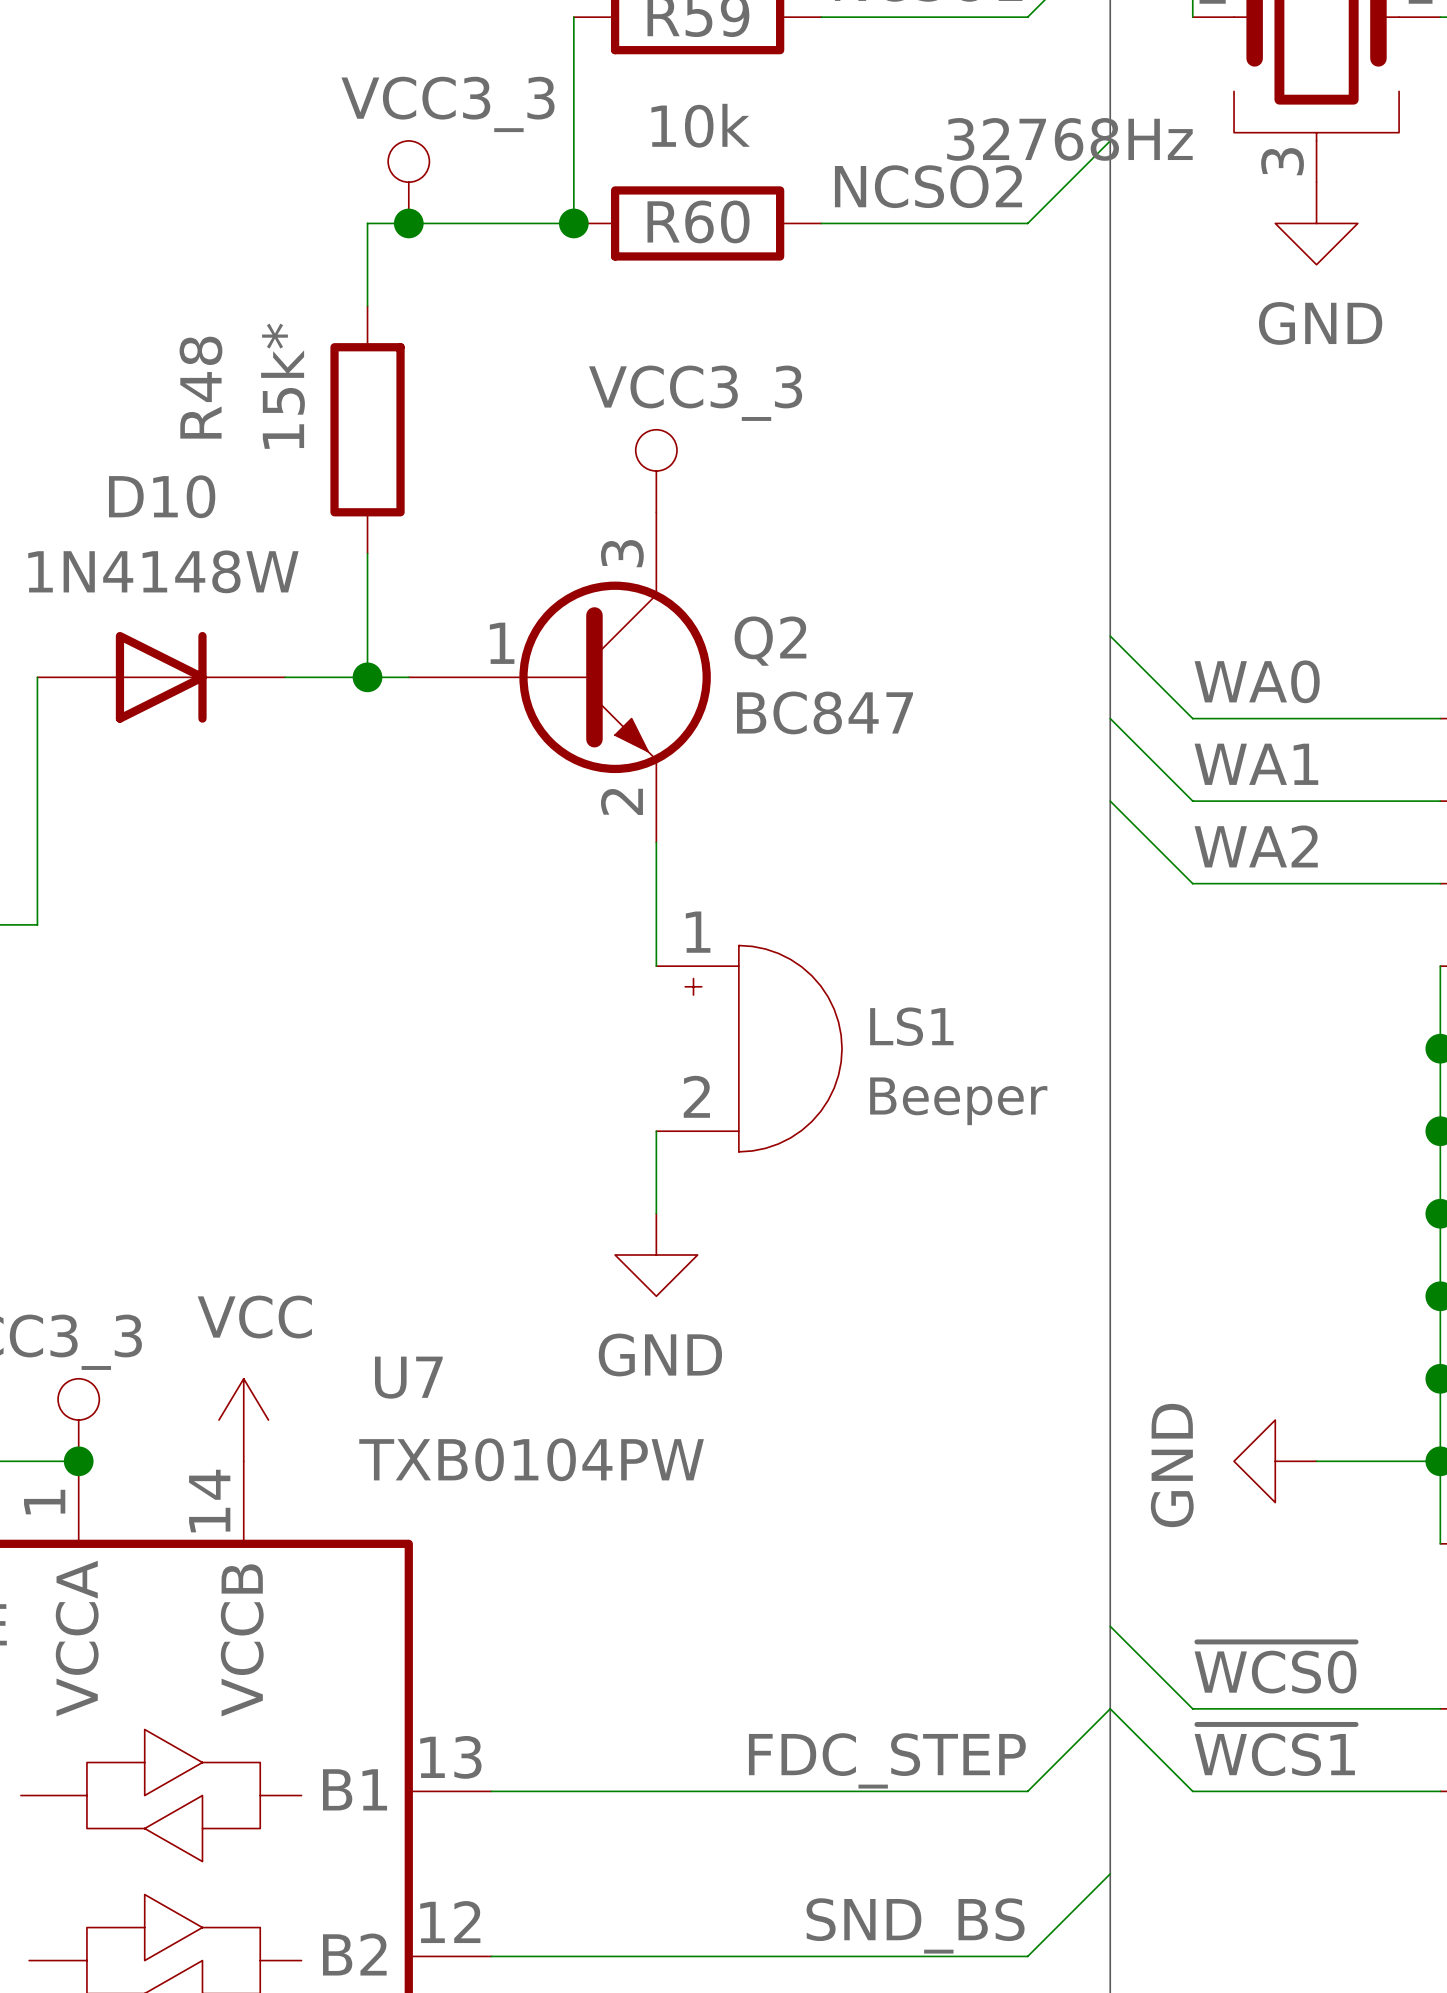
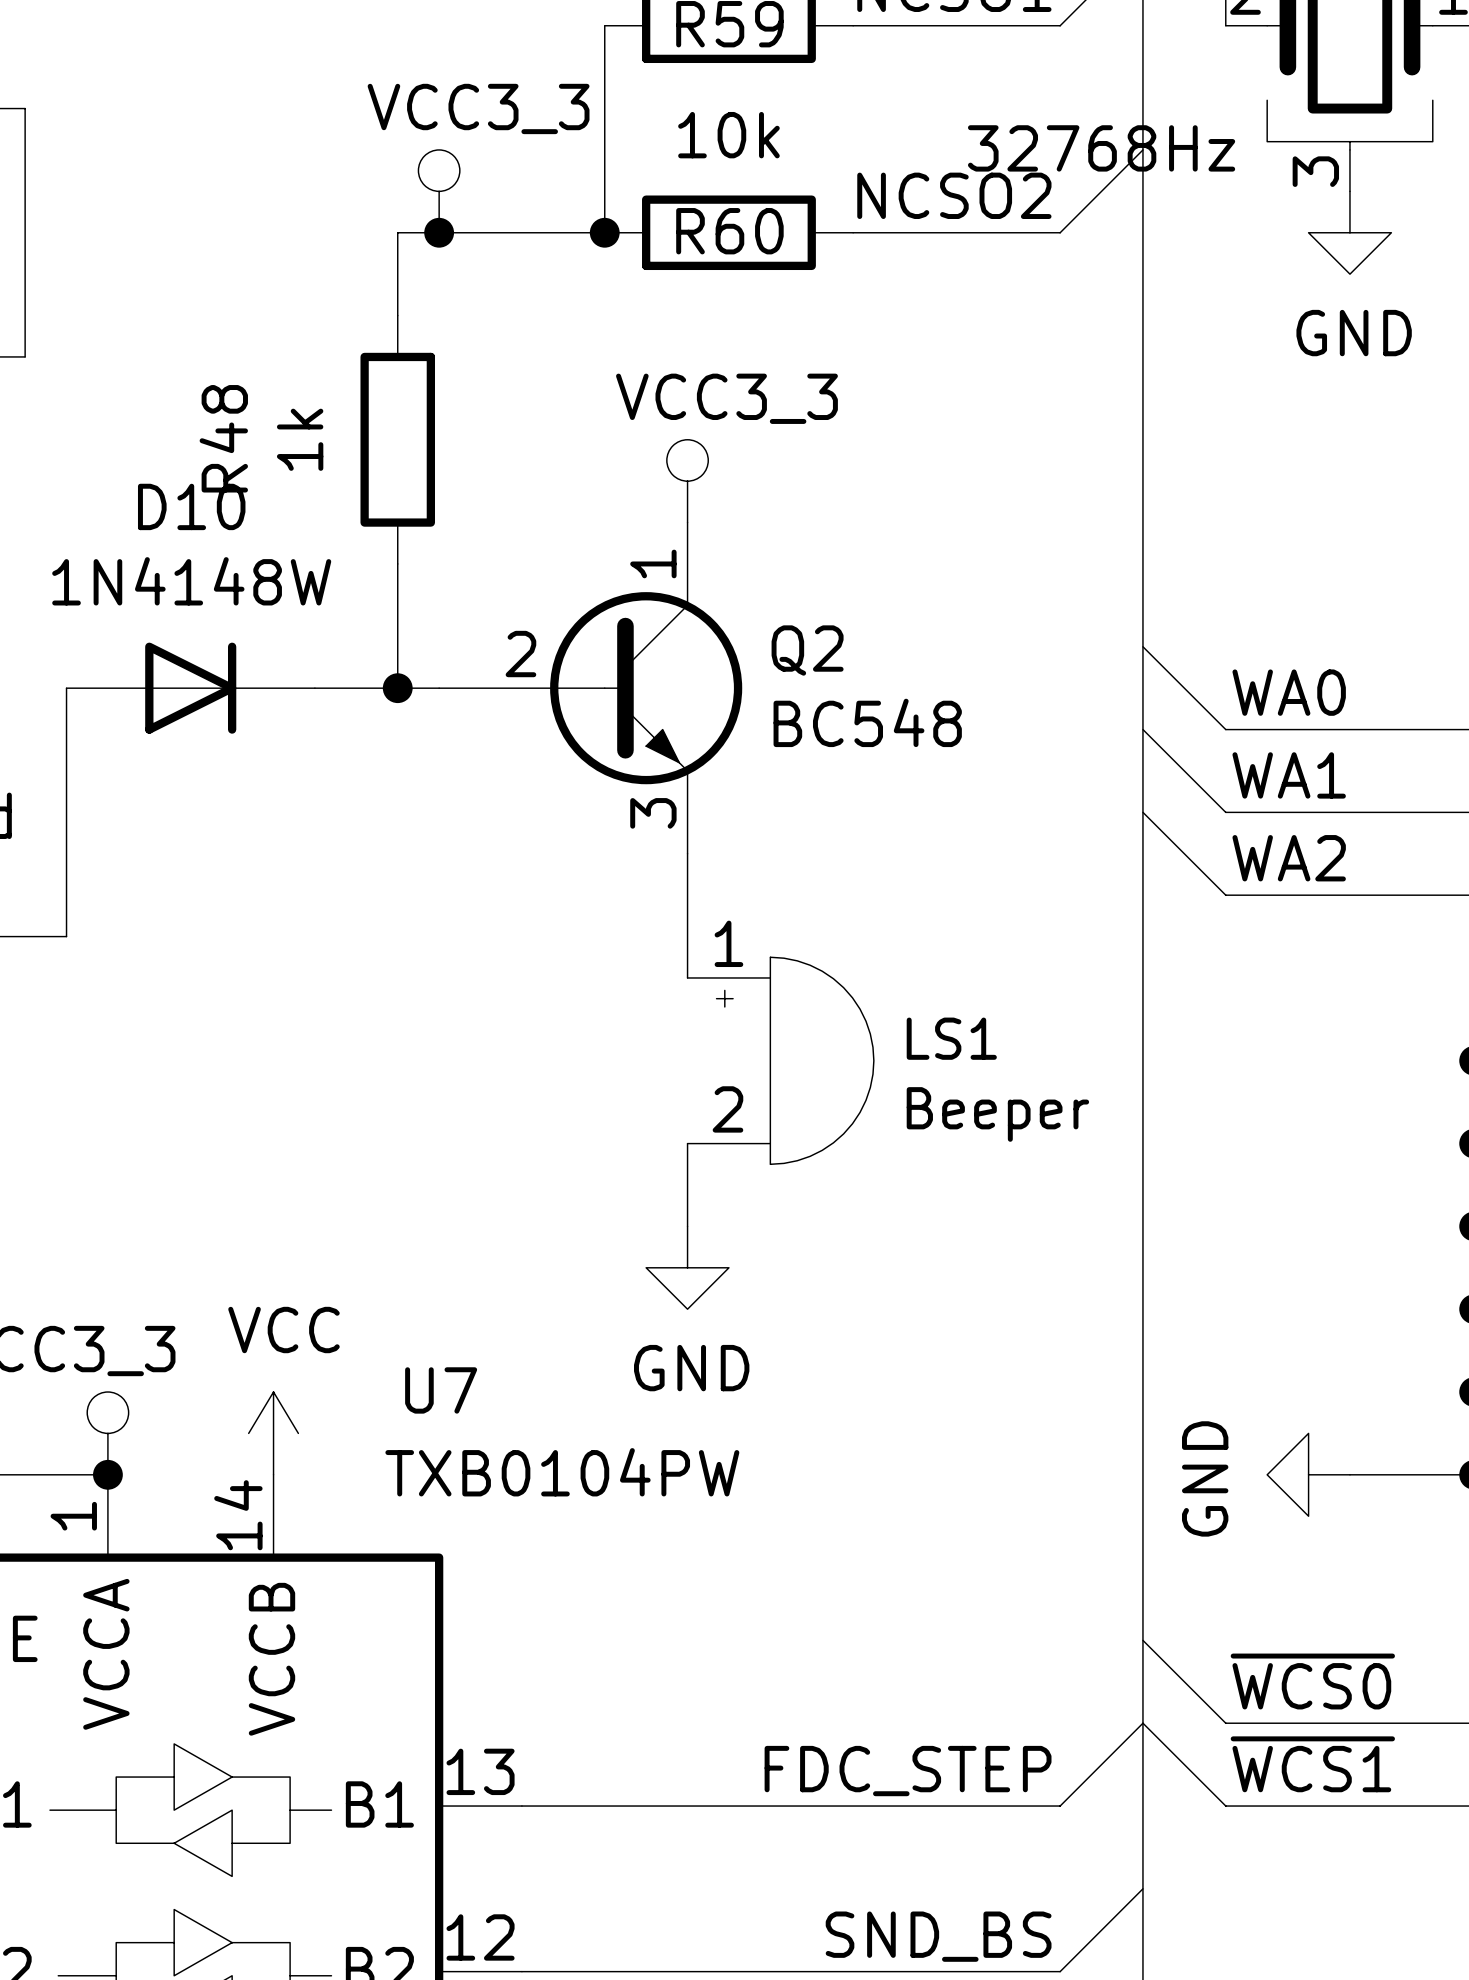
R48 value: 15k* (282, 386) -> 1k (300, 439)
R48 name position: R48 (200, 387) -> R48 (223, 438)
Q2 symbol: [408, 512, 711, 843] -> [439, 522, 743, 854]
Q2 value: BC847 (825, 712) -> BC548 (867, 722)

